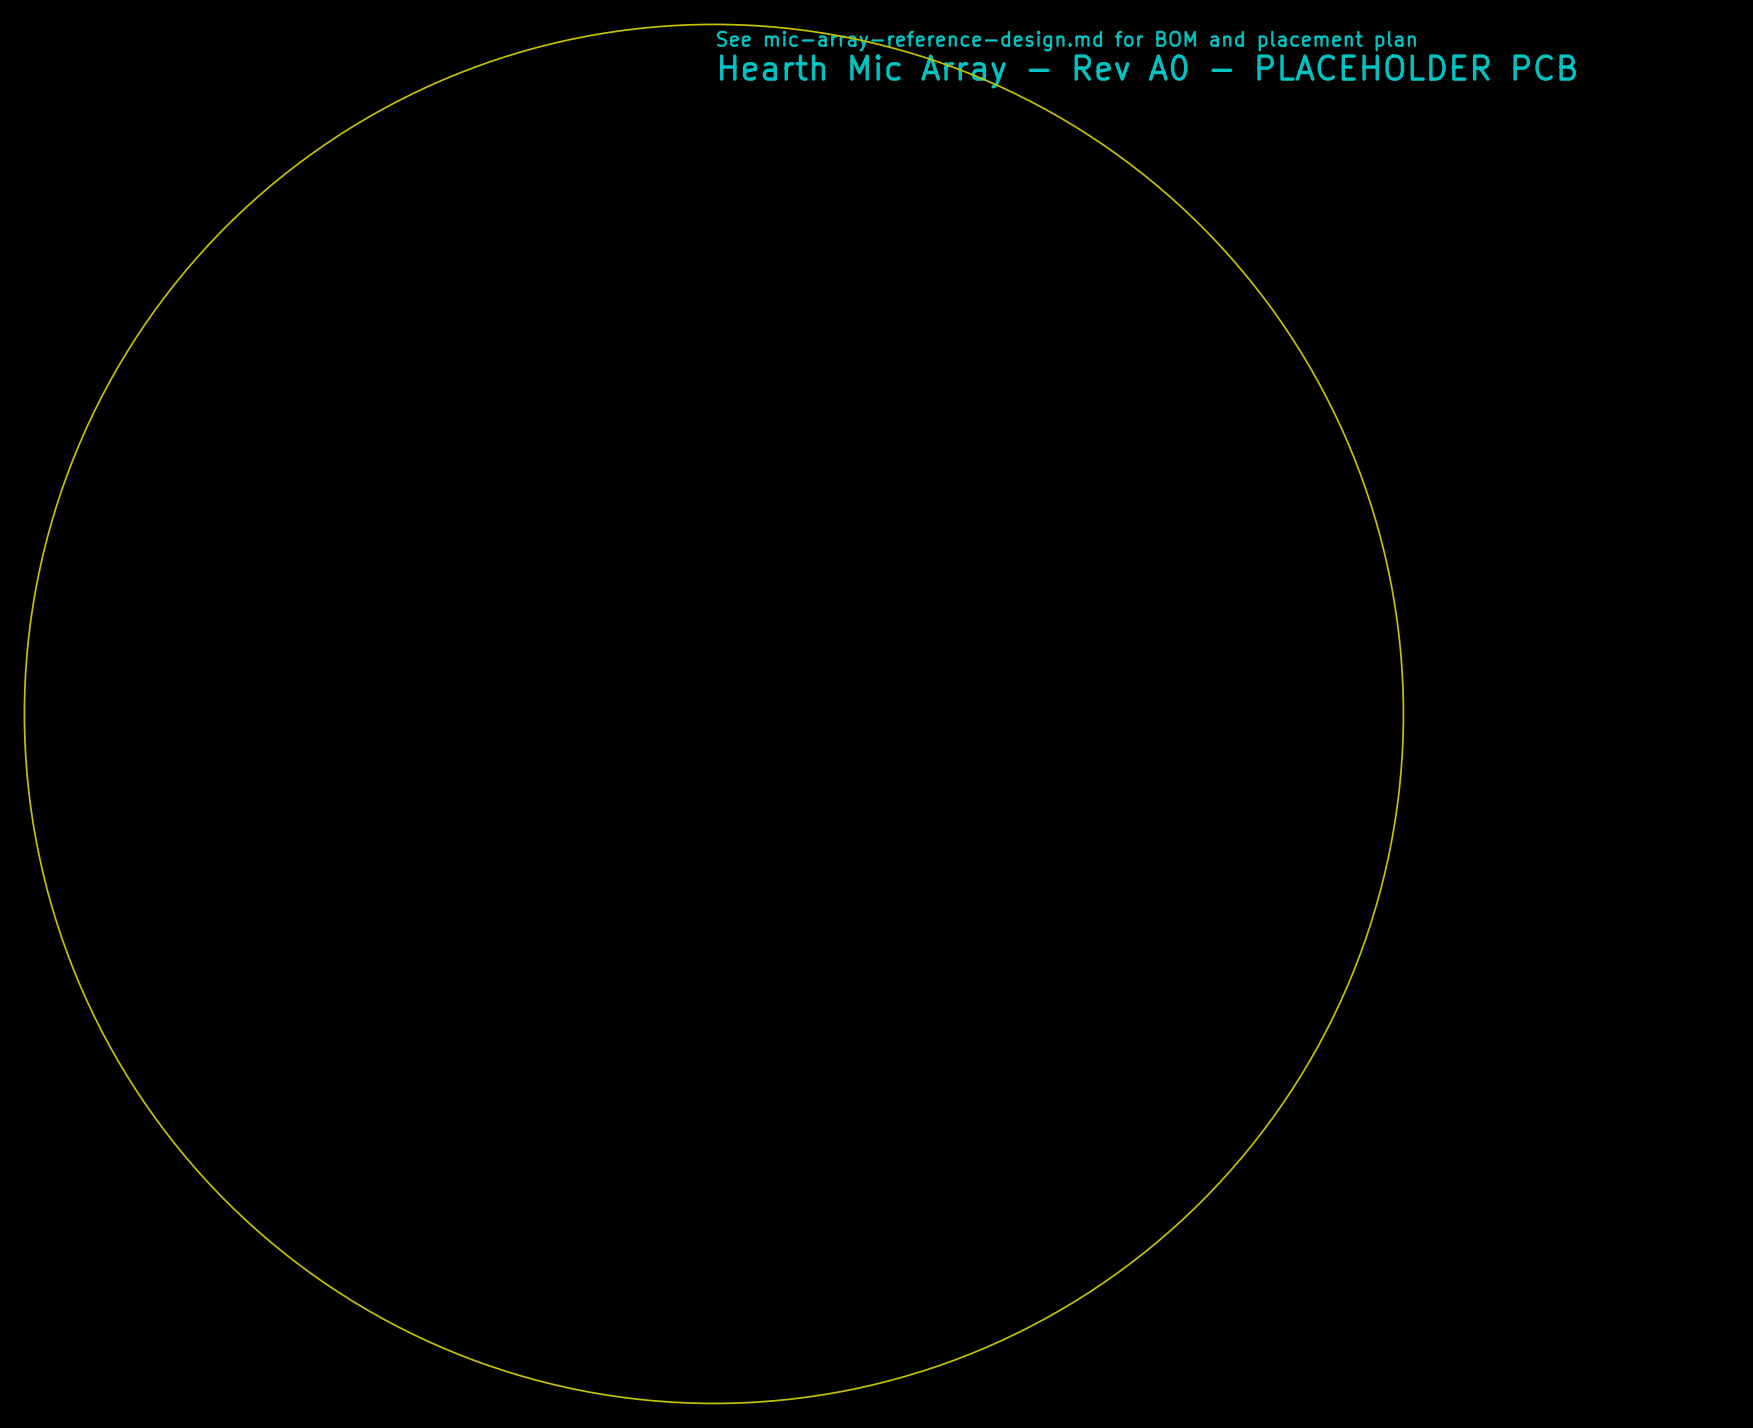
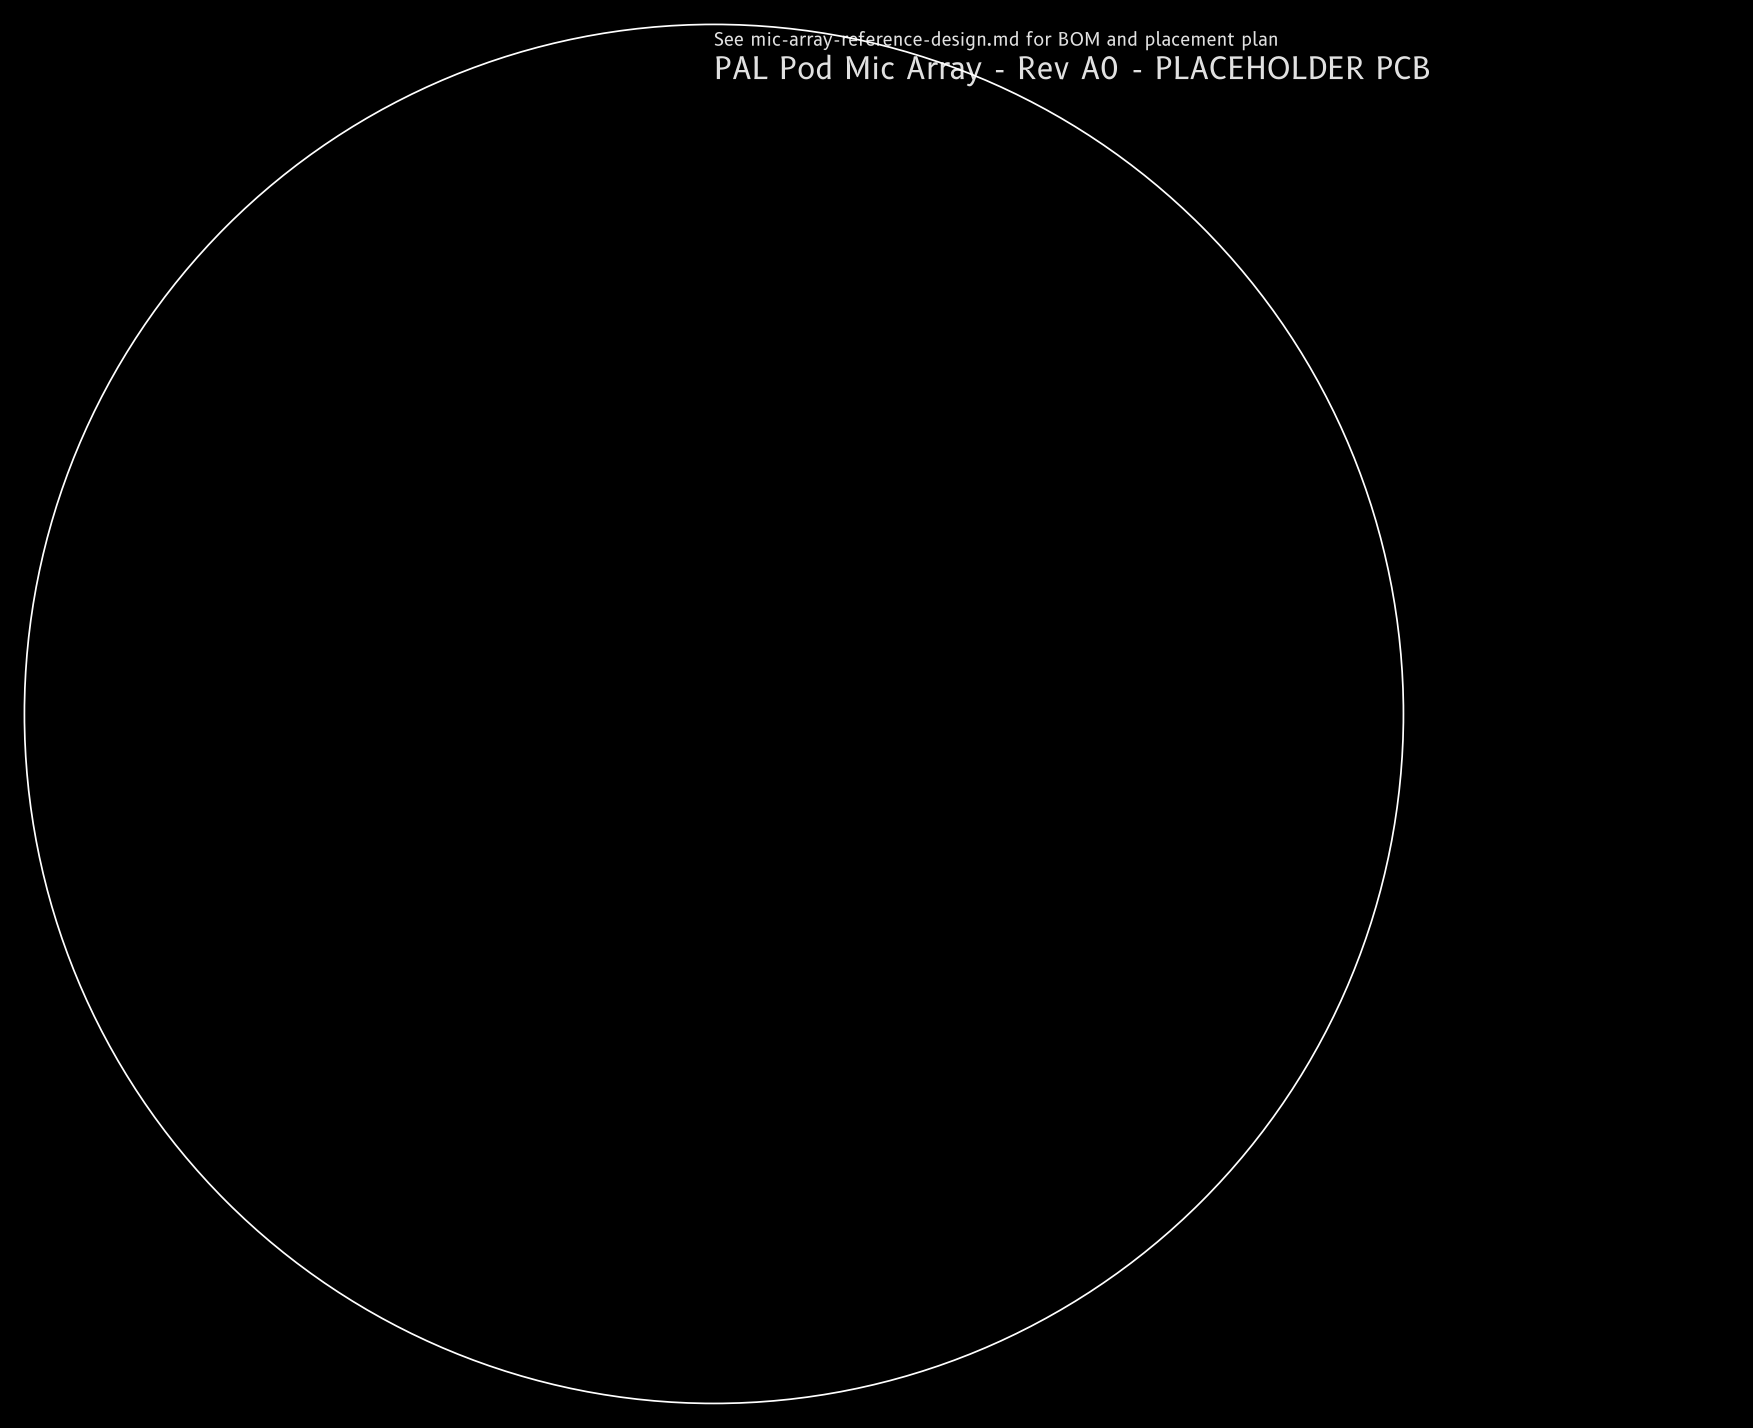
text: Hearth Mic Array - Rev A0 - PLACEHOLDER PCB (1147, 71) -> PAL Pod Mic Array - Rev A0 - PLACEHOLDER PCB (1072, 70)

